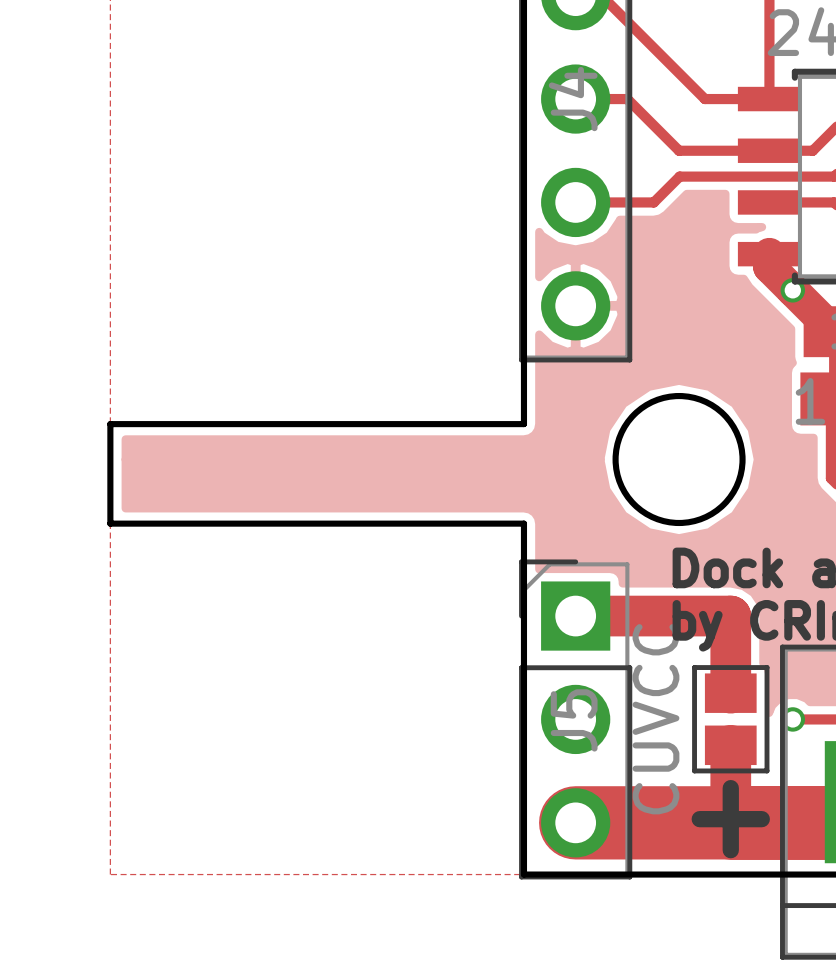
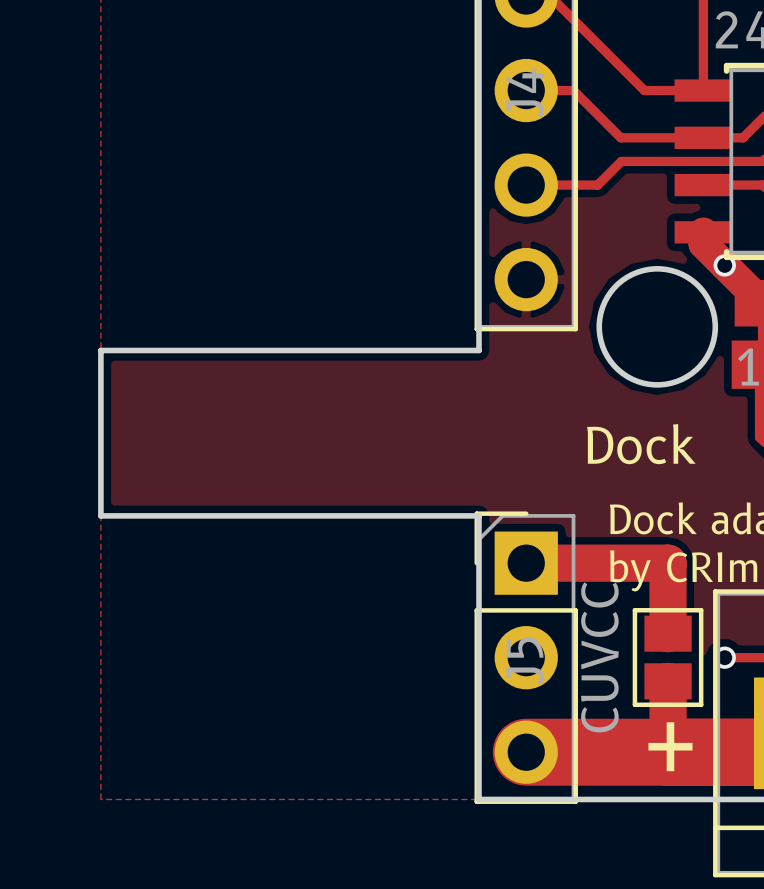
board edge: (523, 383) (523, 424) (110, 424) -> (478, 350) (100, 350) (100, 387)
round board edge position: (679, 459) -> (657, 326)
text: none -> Dock (641, 444)
board edge: (110, 523) (523, 523) (523, 564) -> (100, 478) (100, 515) (478, 515)

